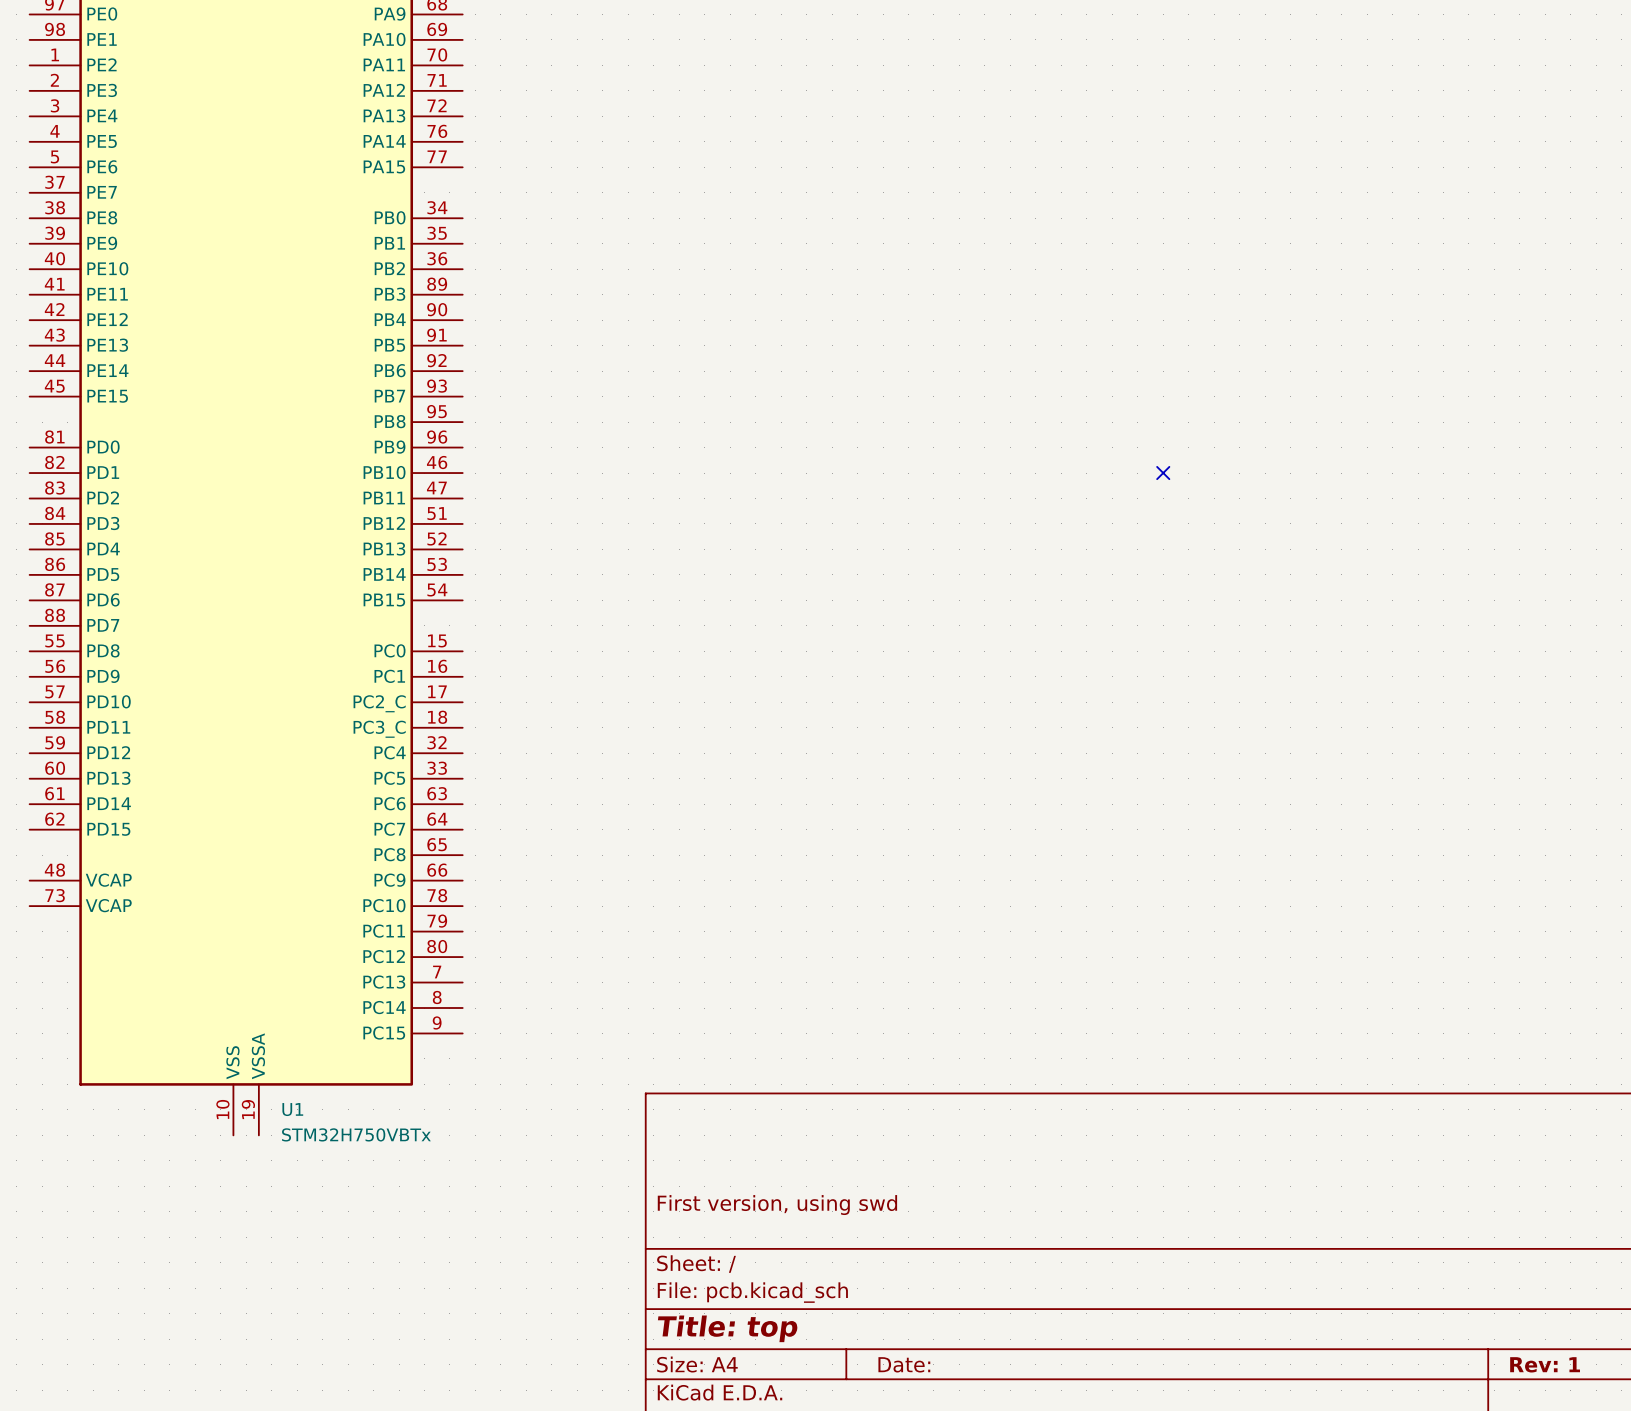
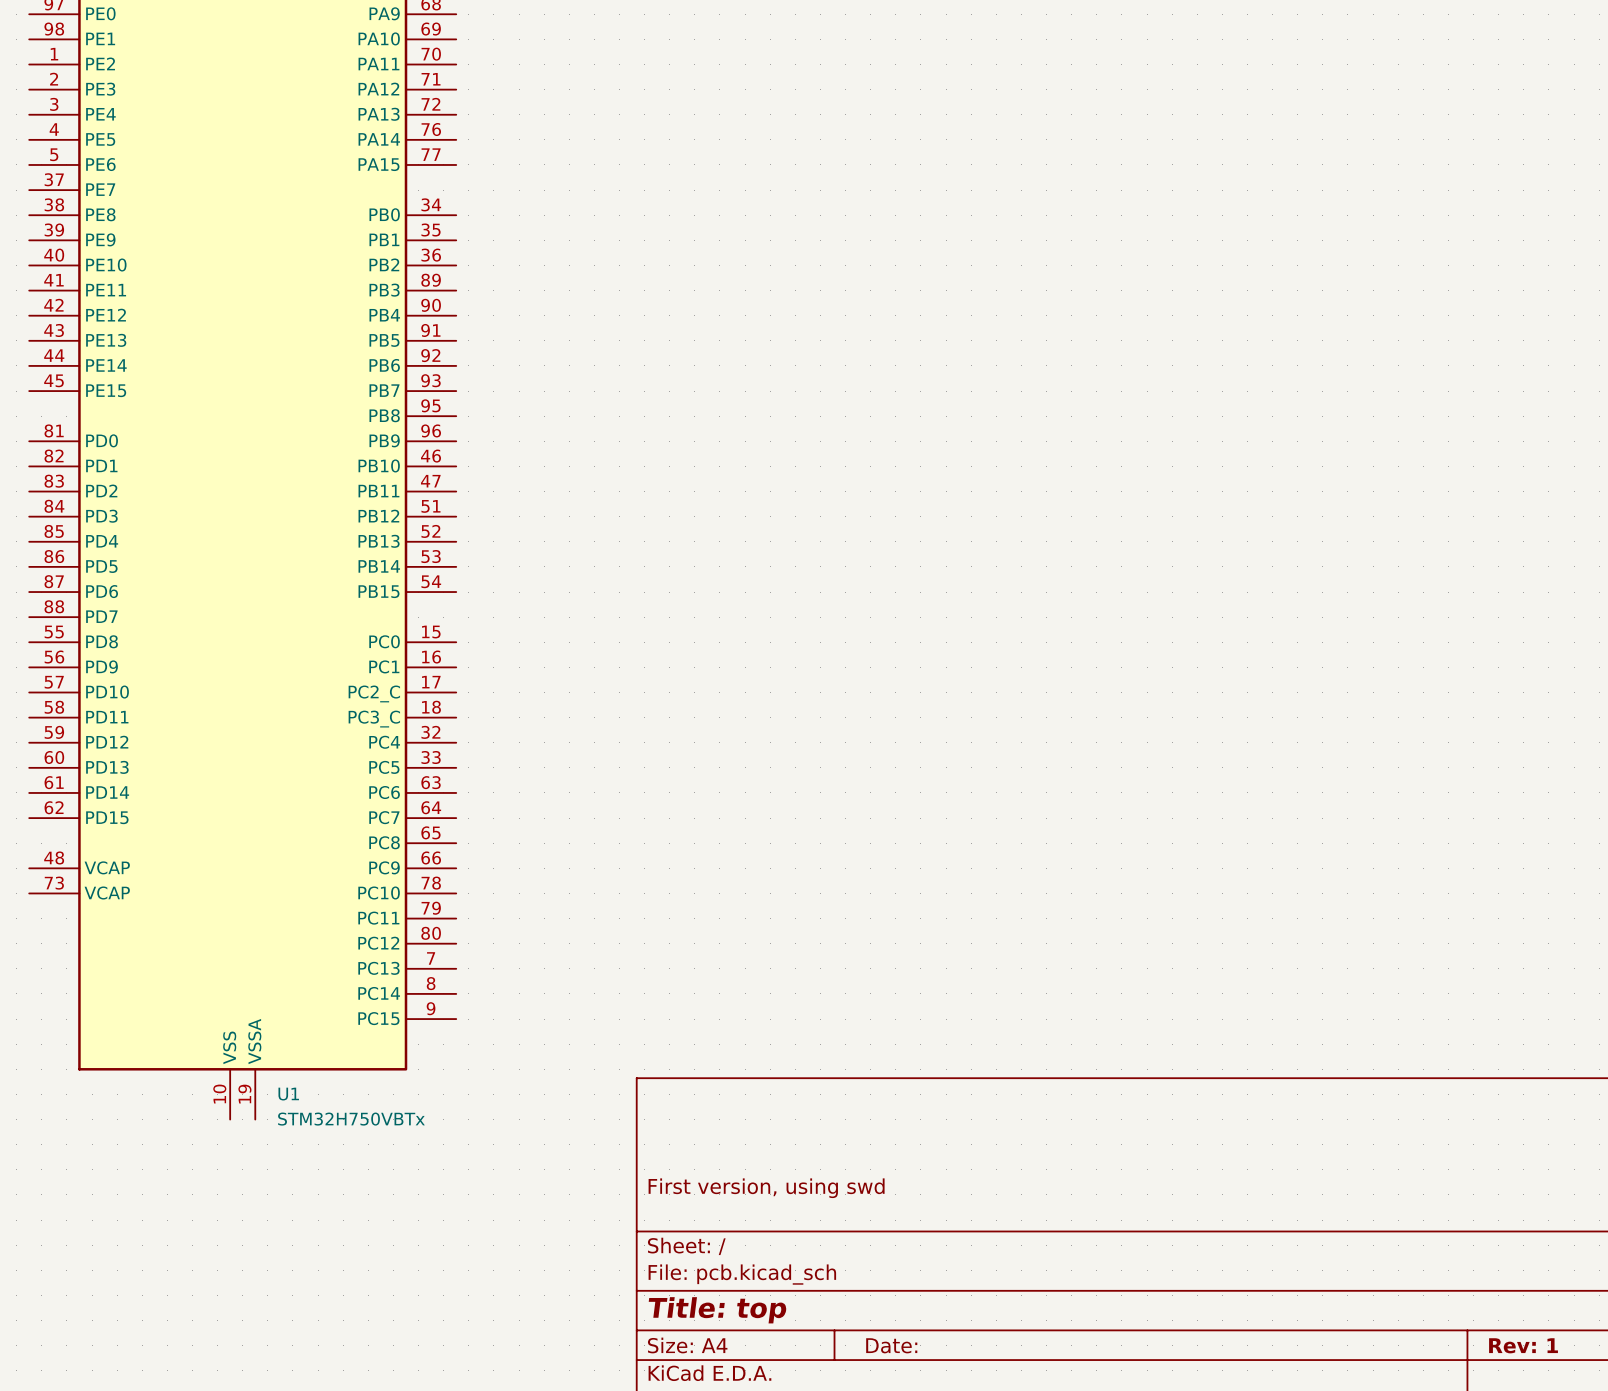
no-connect mark: (1163, 473) -> none

